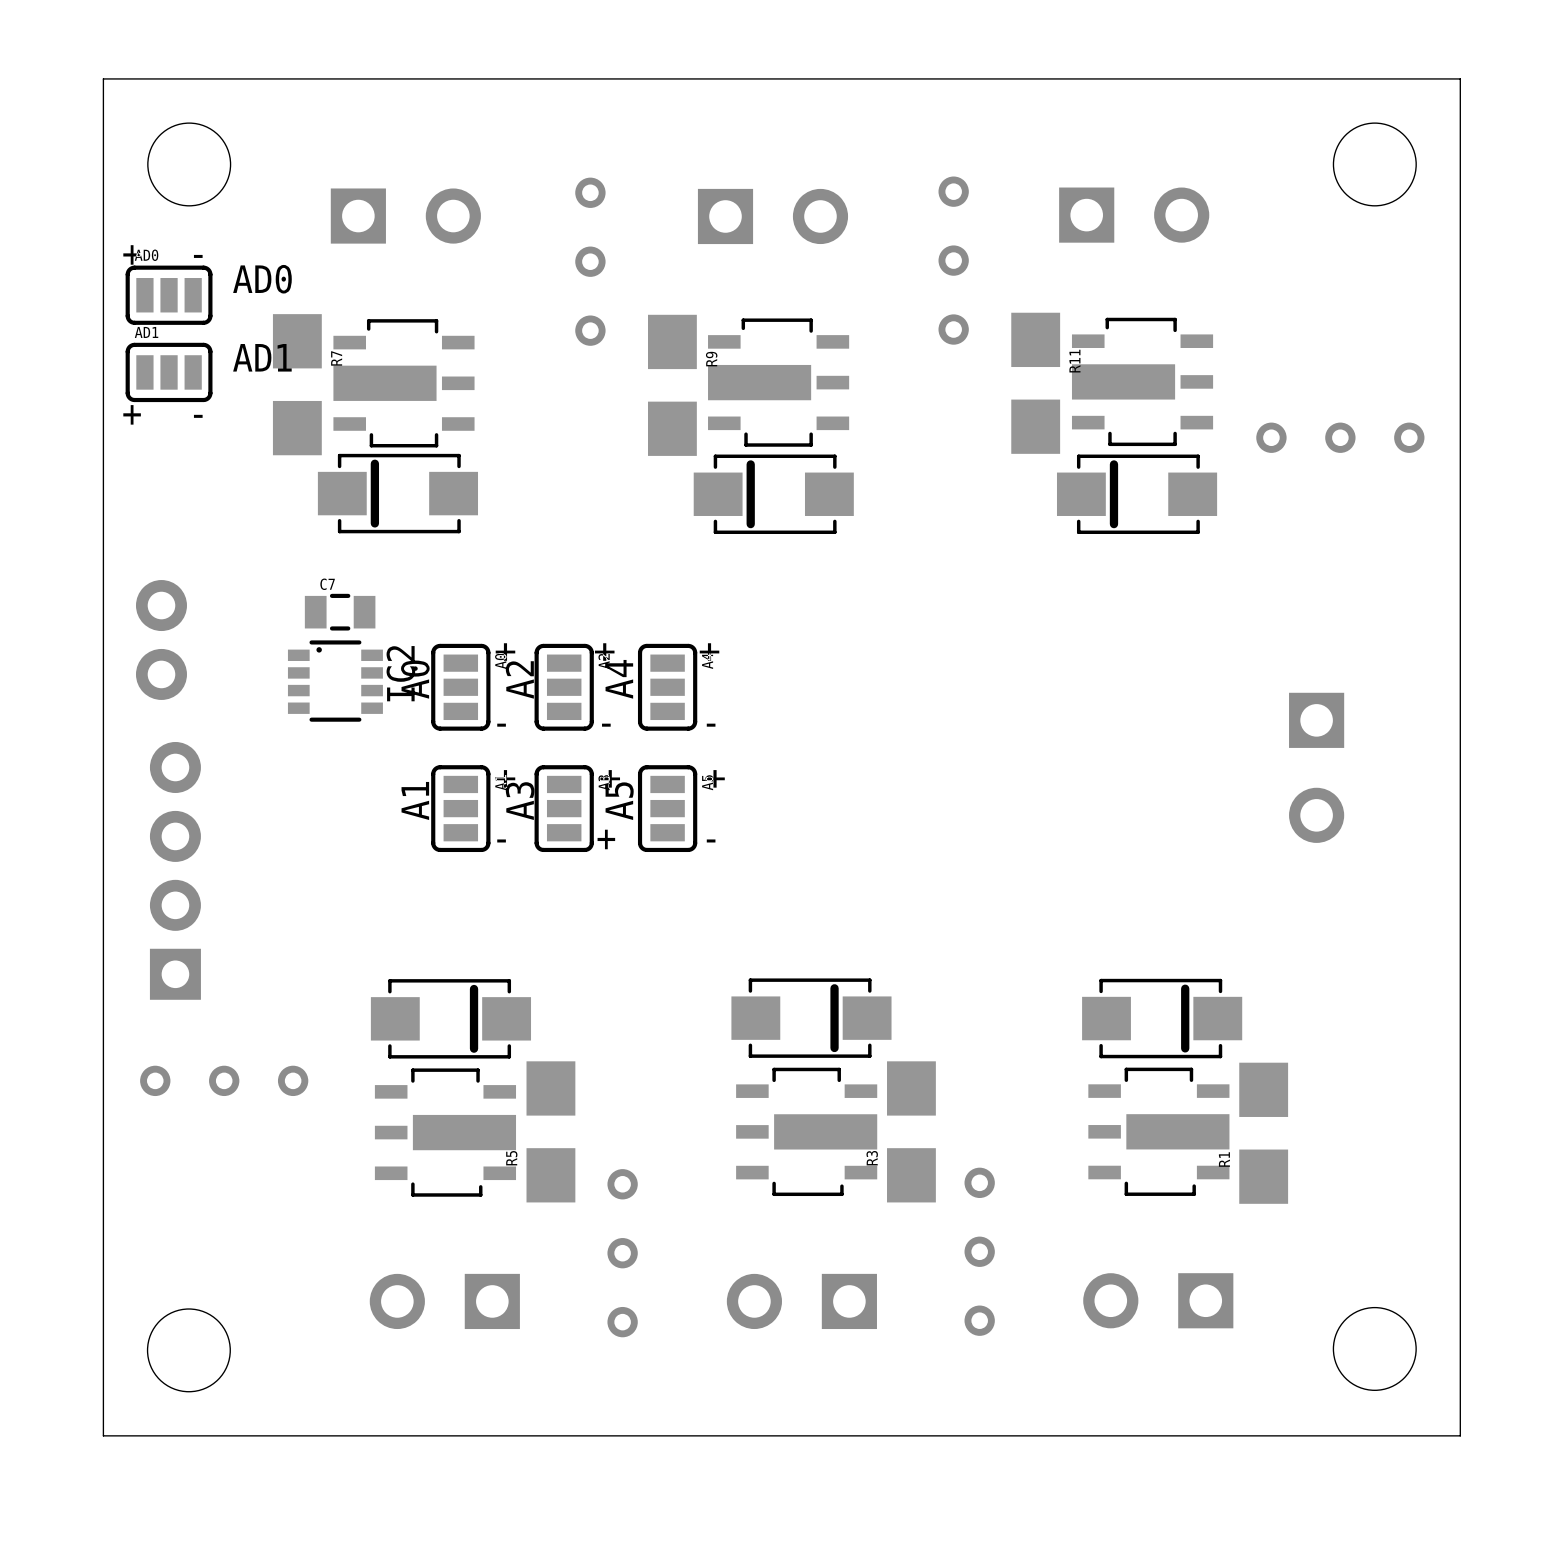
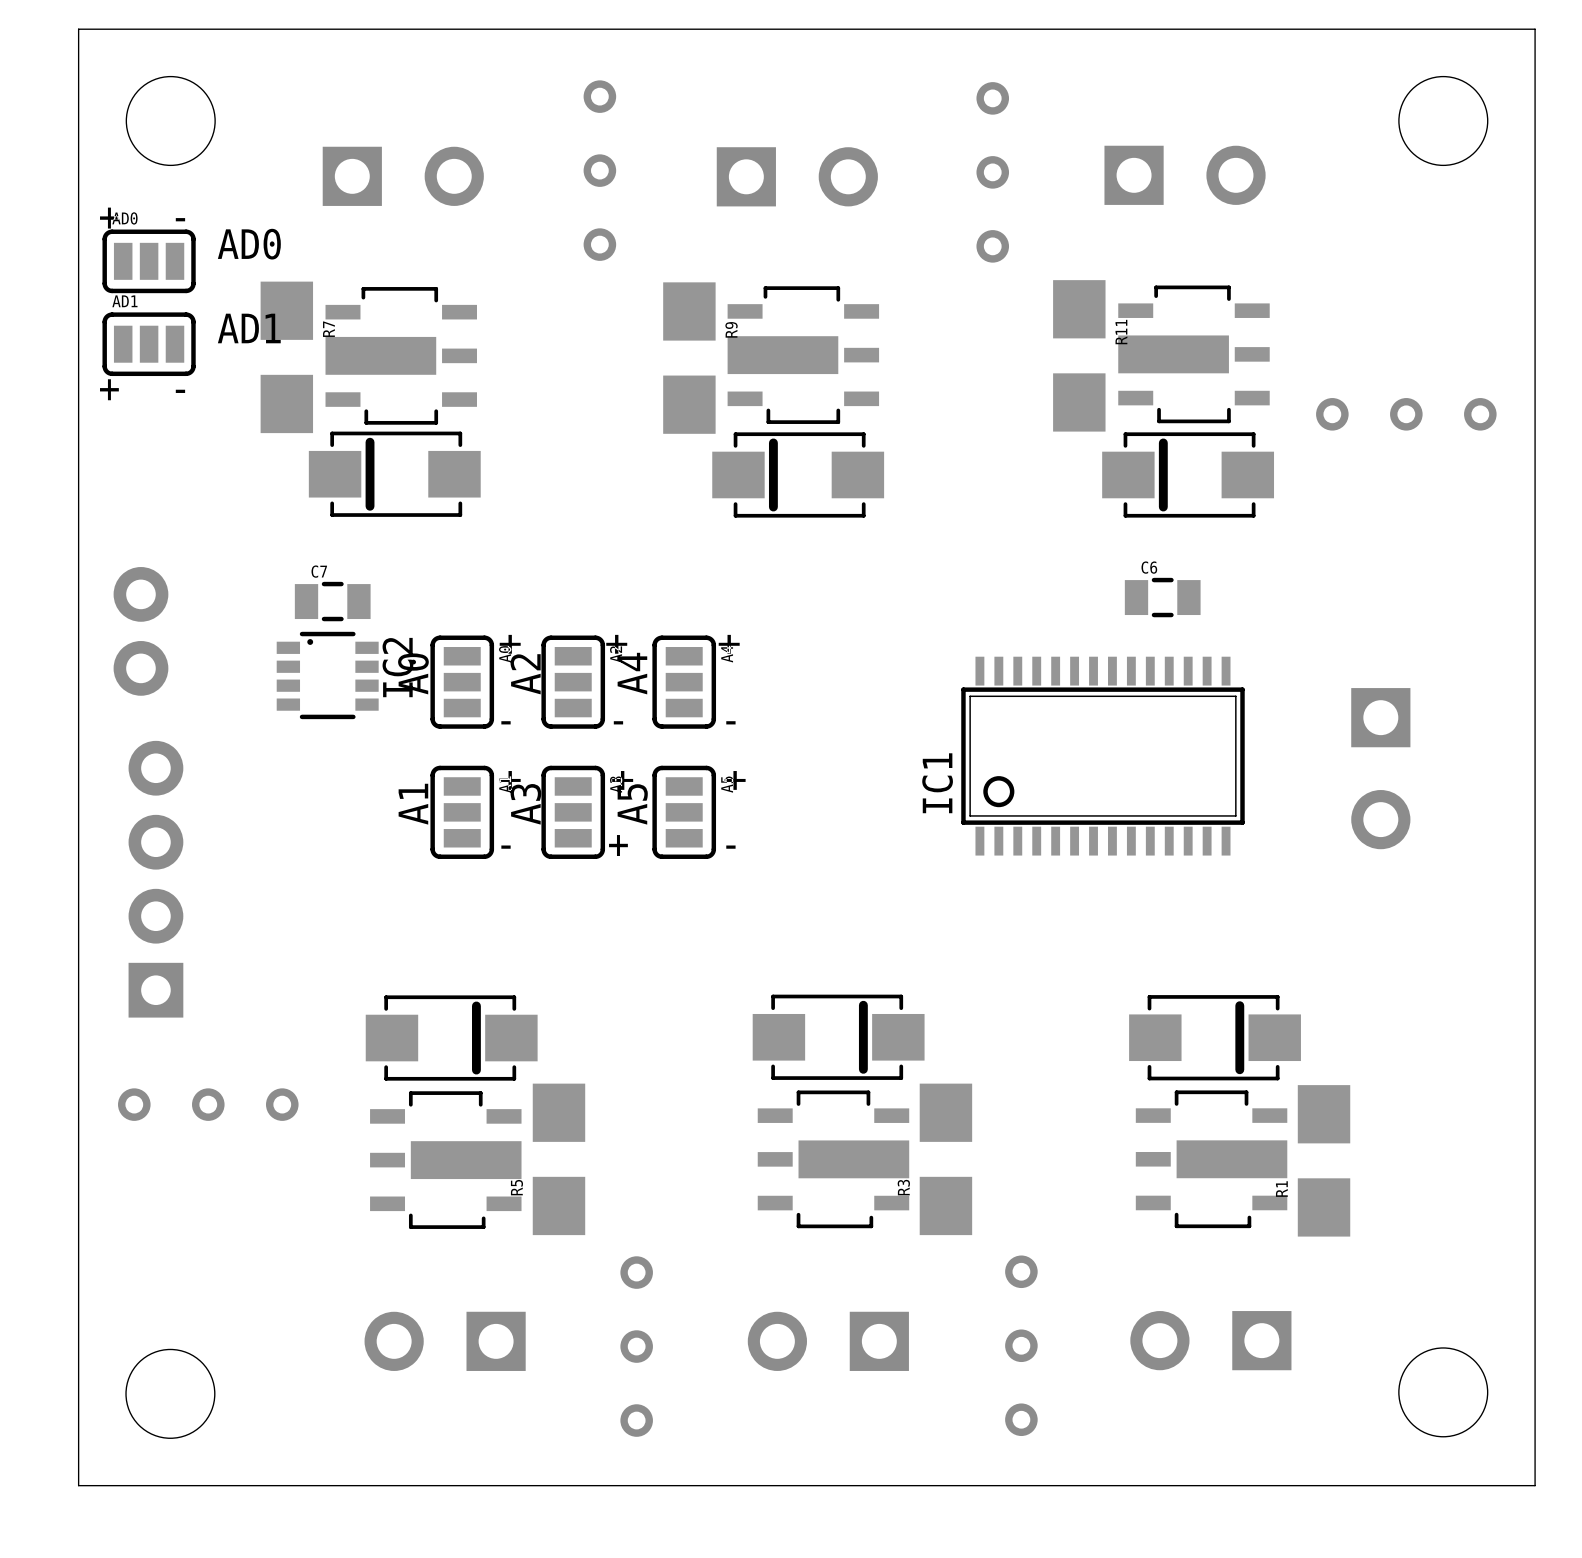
part position: (953, 260) -> (992, 172)
part position: (590, 261) -> (599, 170)
C6: none -> (1162, 597)
IC1: none -> (1102, 756)
part position: (979, 1251) -> (1021, 1345)
part position: (622, 1253) -> (636, 1346)

